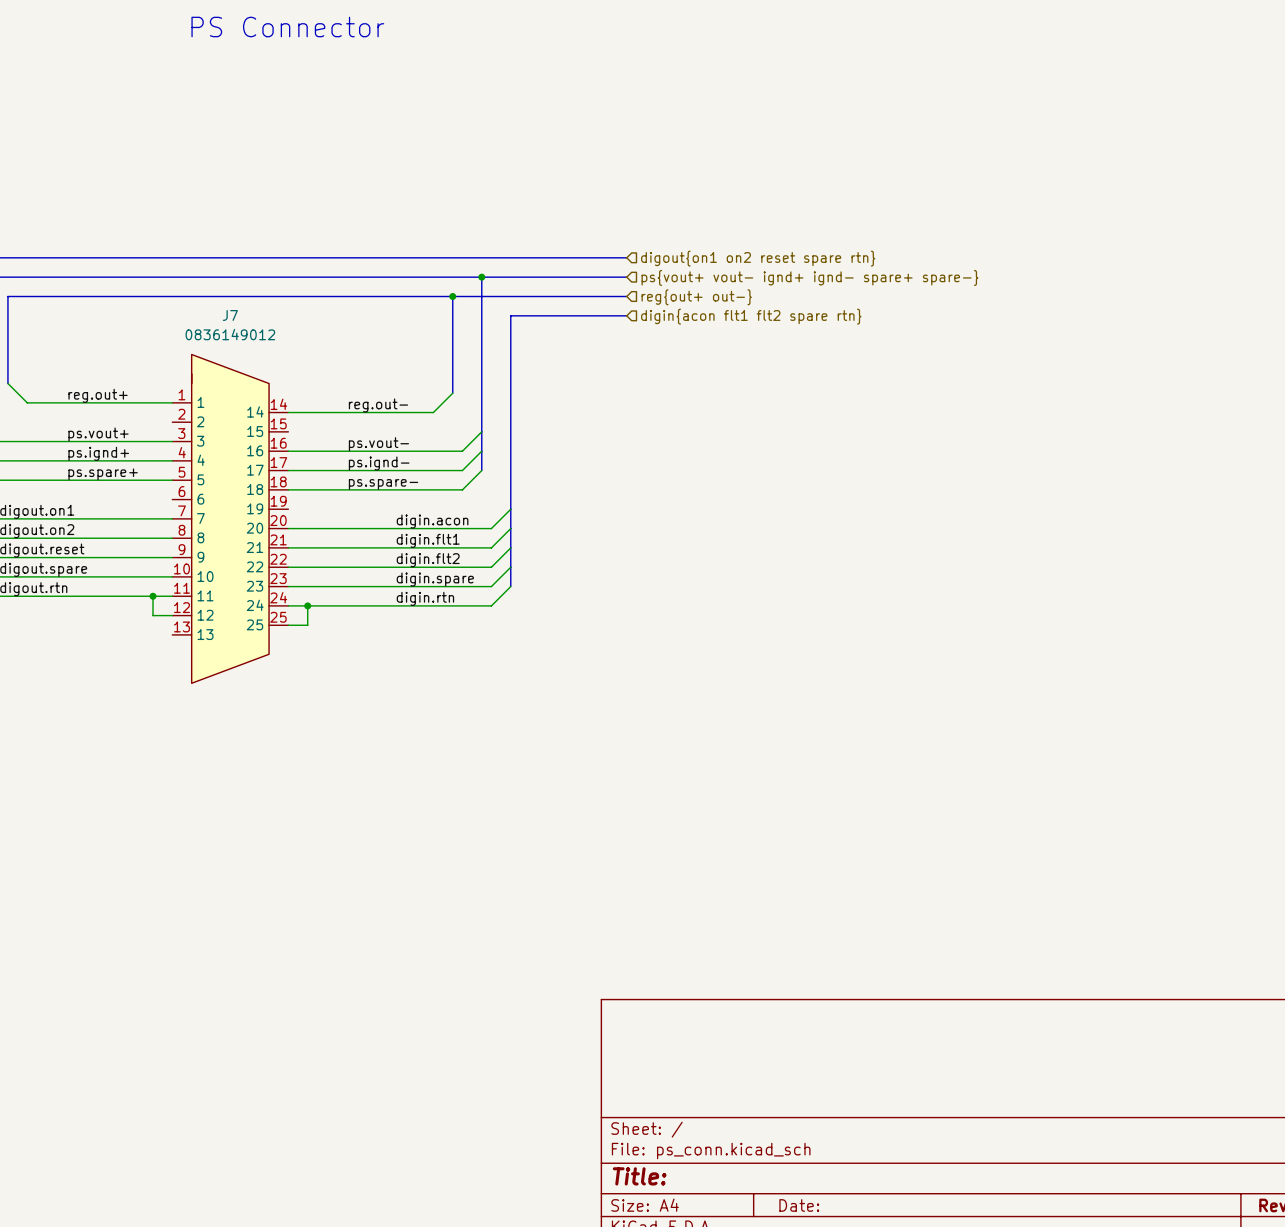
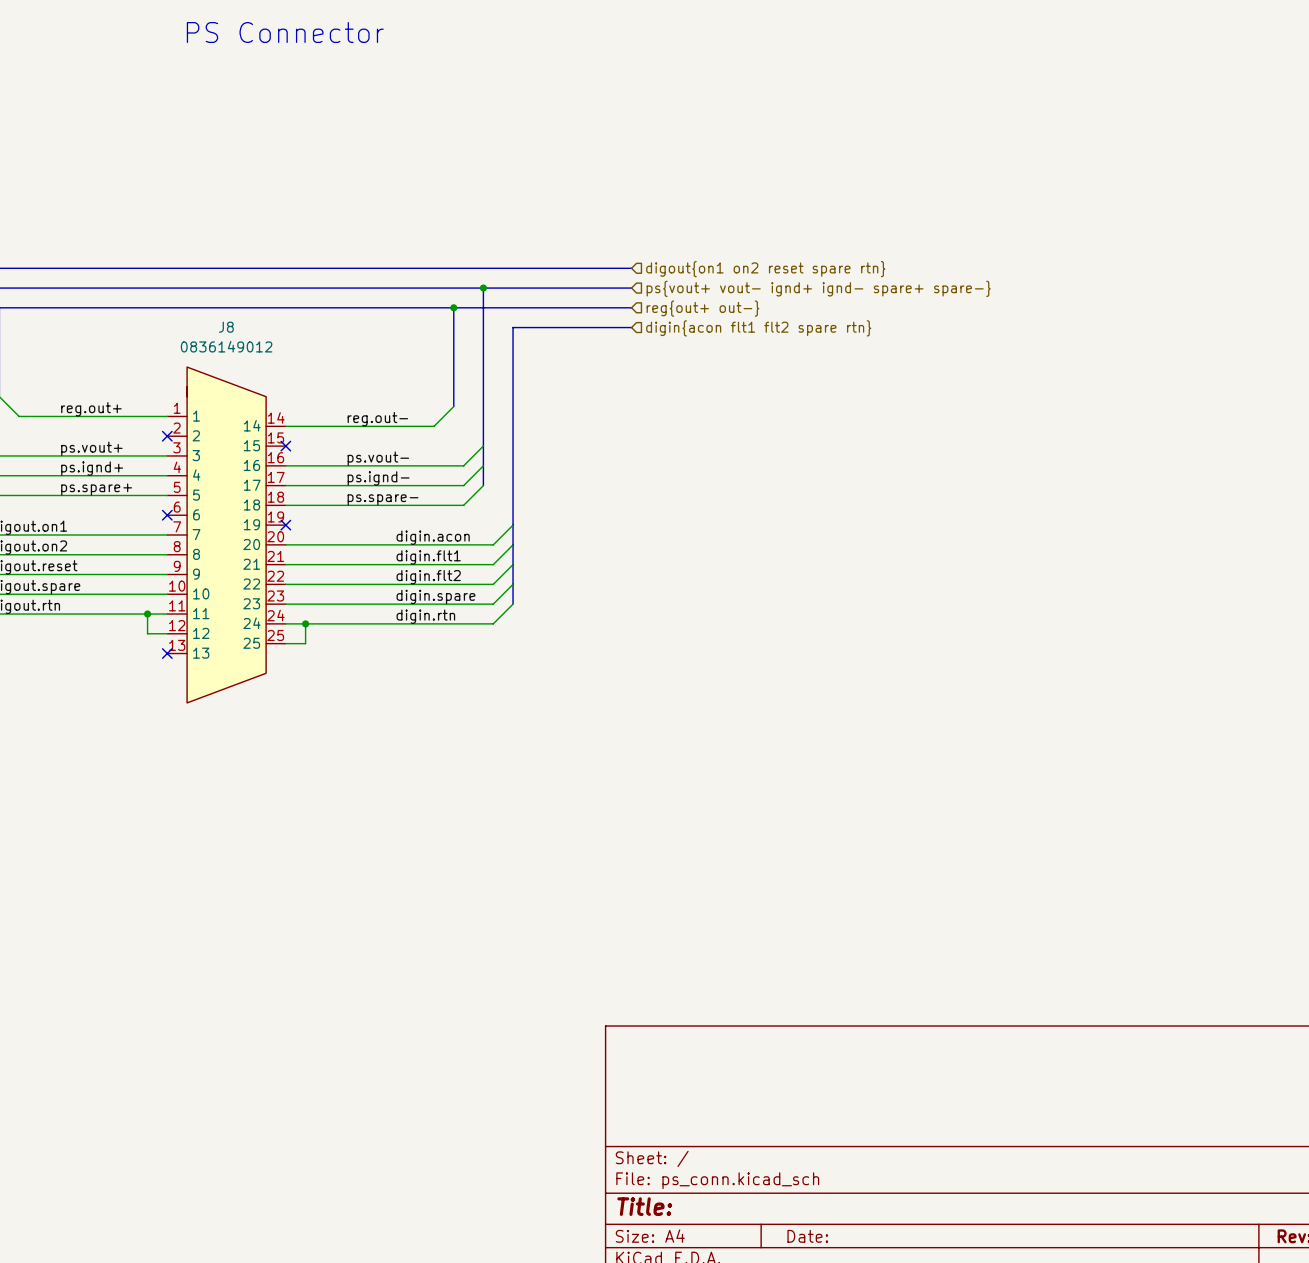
J7 name: J7 (230, 315) -> J8 (226, 327)
no-connect mark: none -> (167, 436)
no-connect mark: none -> (285, 446)
no-connect mark: none -> (167, 515)
no-connect mark: none -> (285, 525)
no-connect mark: none -> (167, 653)

